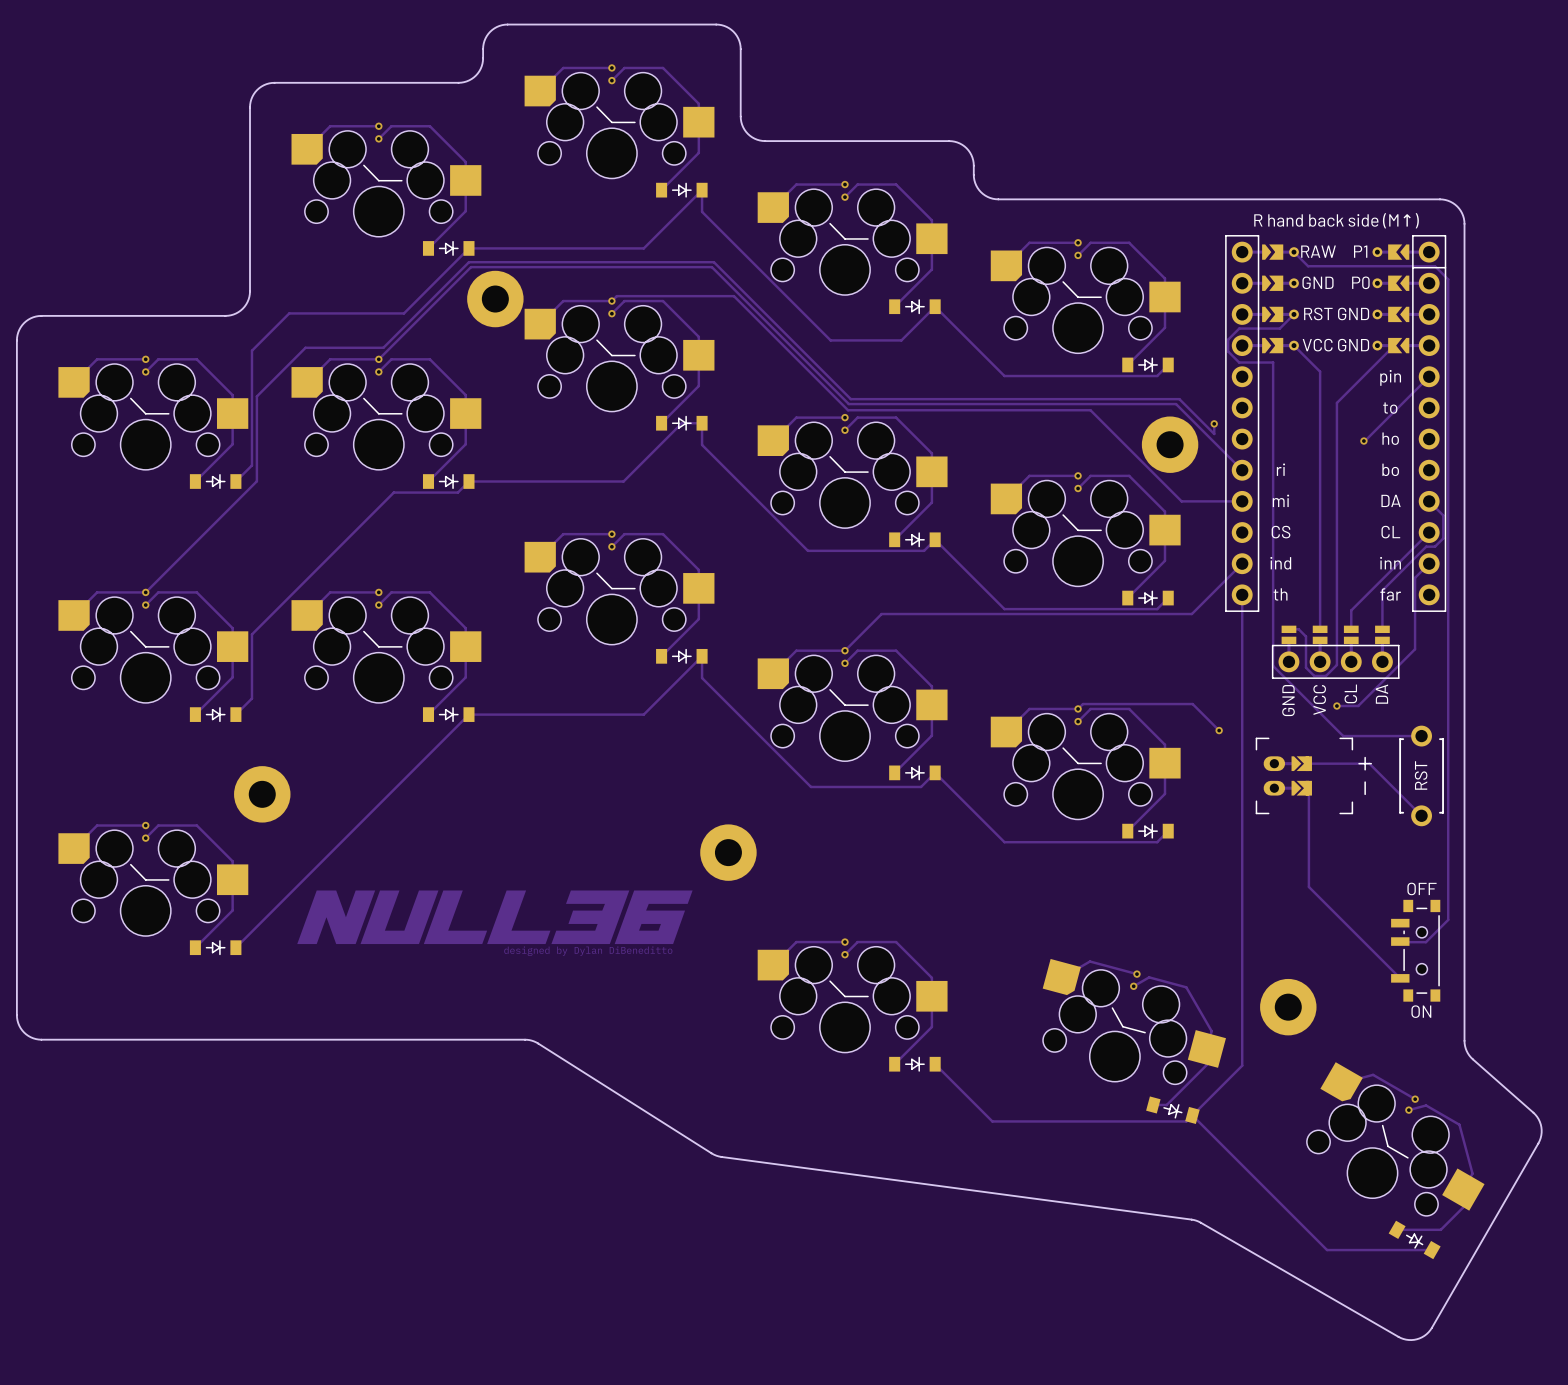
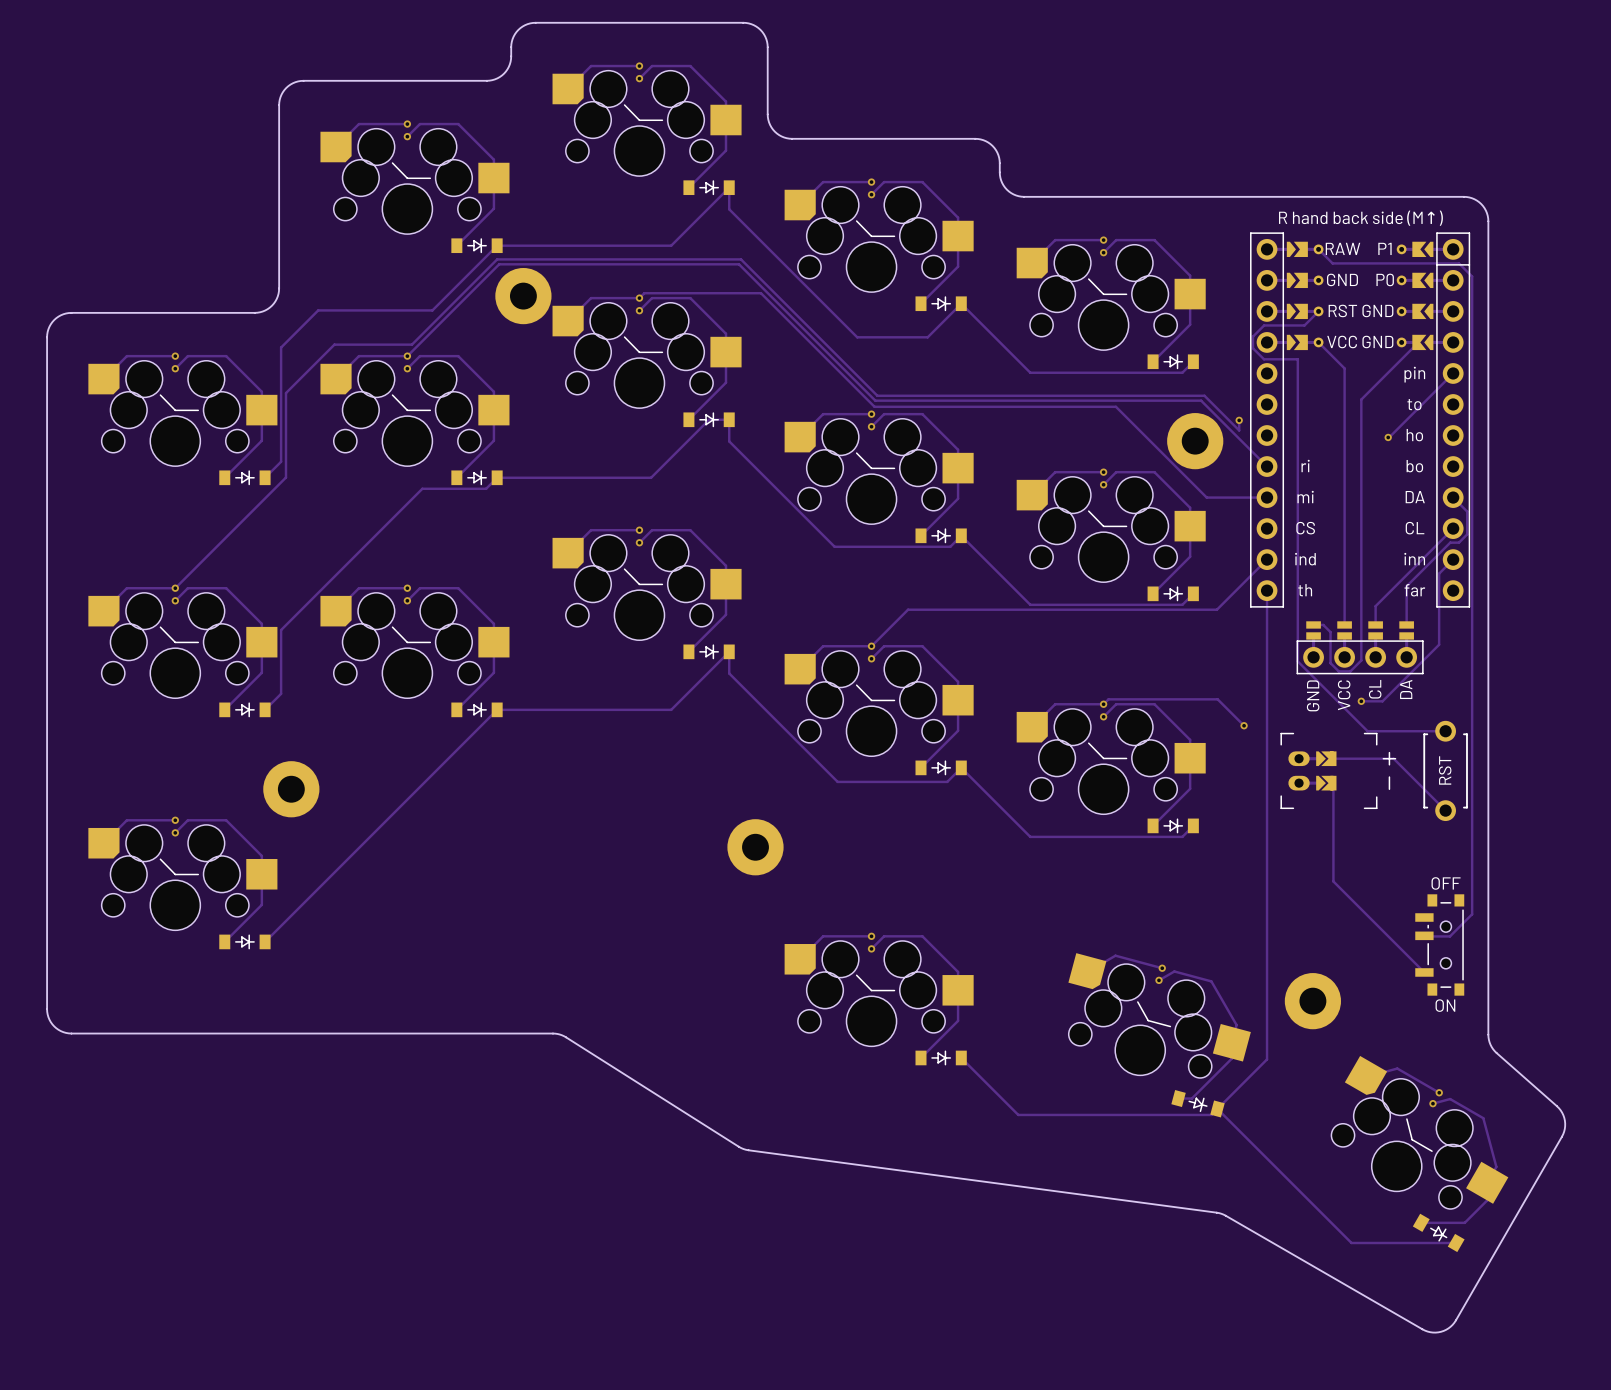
drawing: [297, 890, 693, 956] -> none

